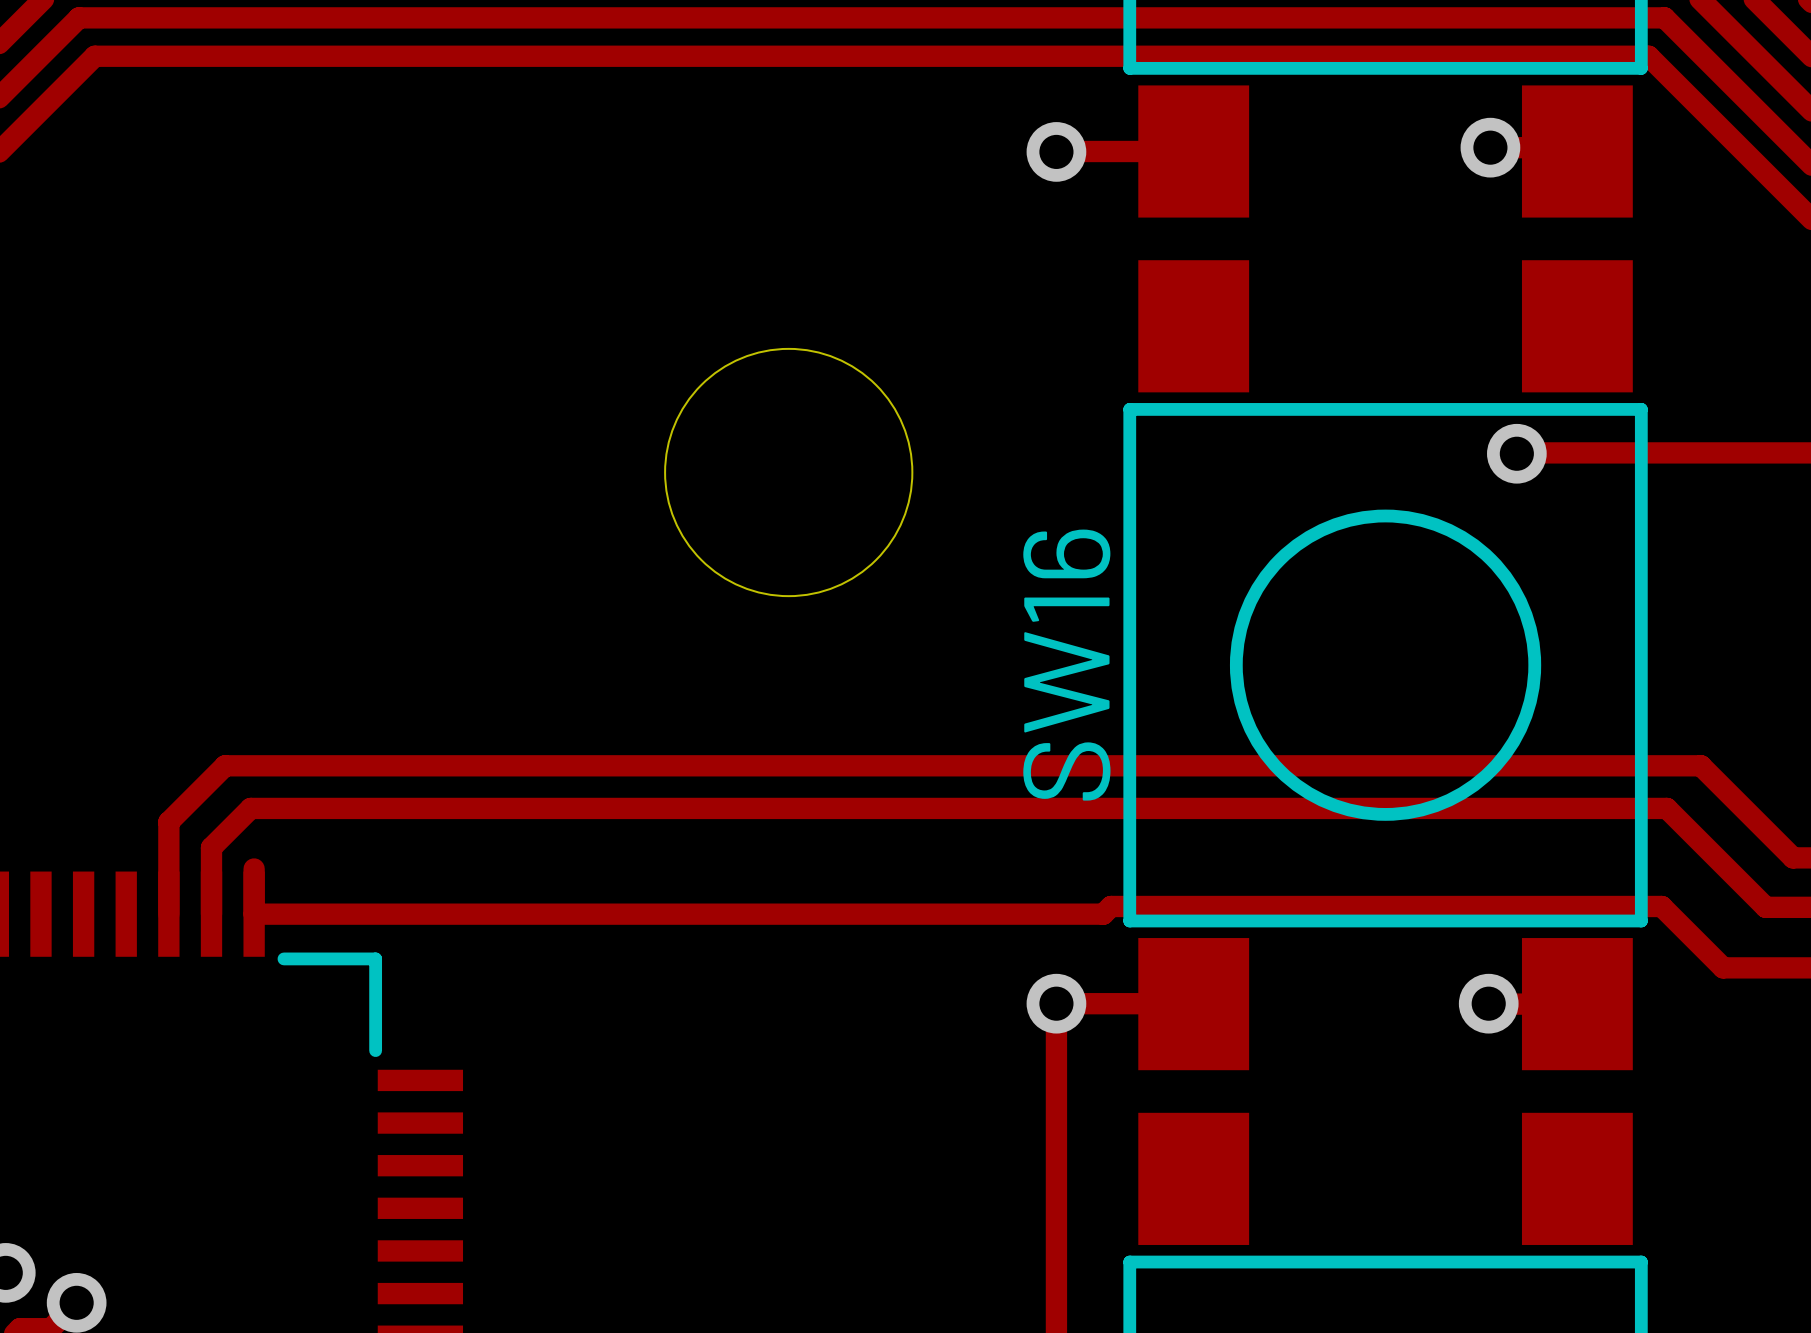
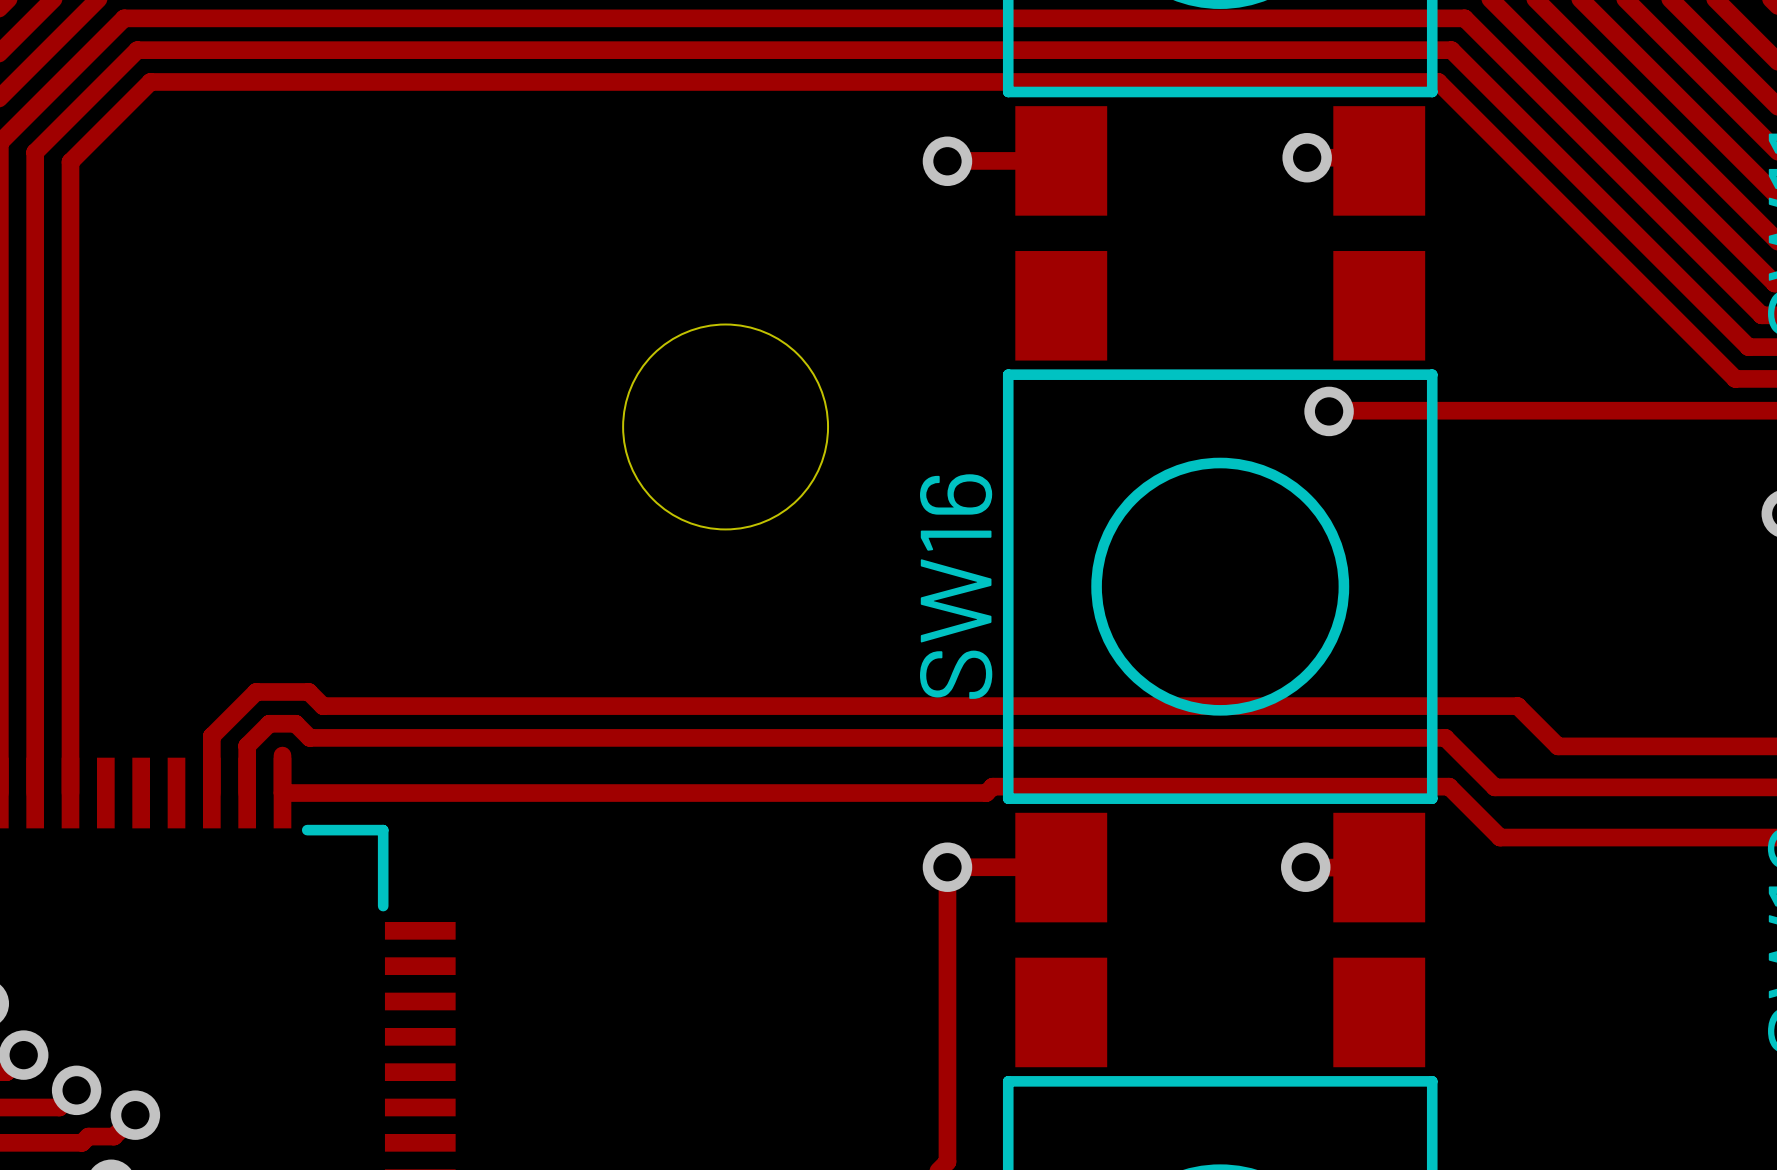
track: (1744, 809) (1701, 765) (225, 765) (168, 822) (168, 845) -> (1517, 706) (322, 706) (308, 691) (256, 691) (211, 736)
track: (211, 857) (211, 847) (250, 808) (1666, 808) (1765, 907) -> (247, 745) (269, 723) (295, 723) (309, 737) (1445, 737) (1494, 787) (1535, 787)

